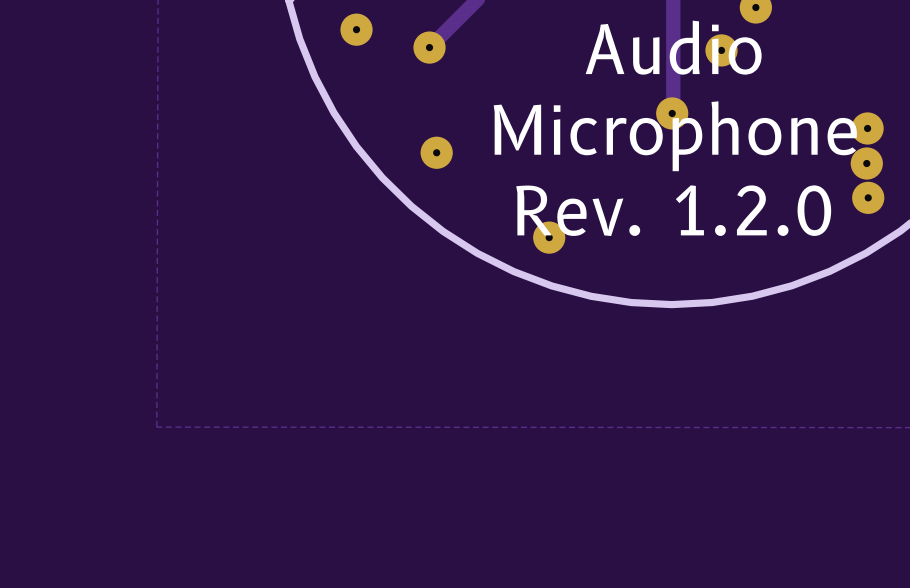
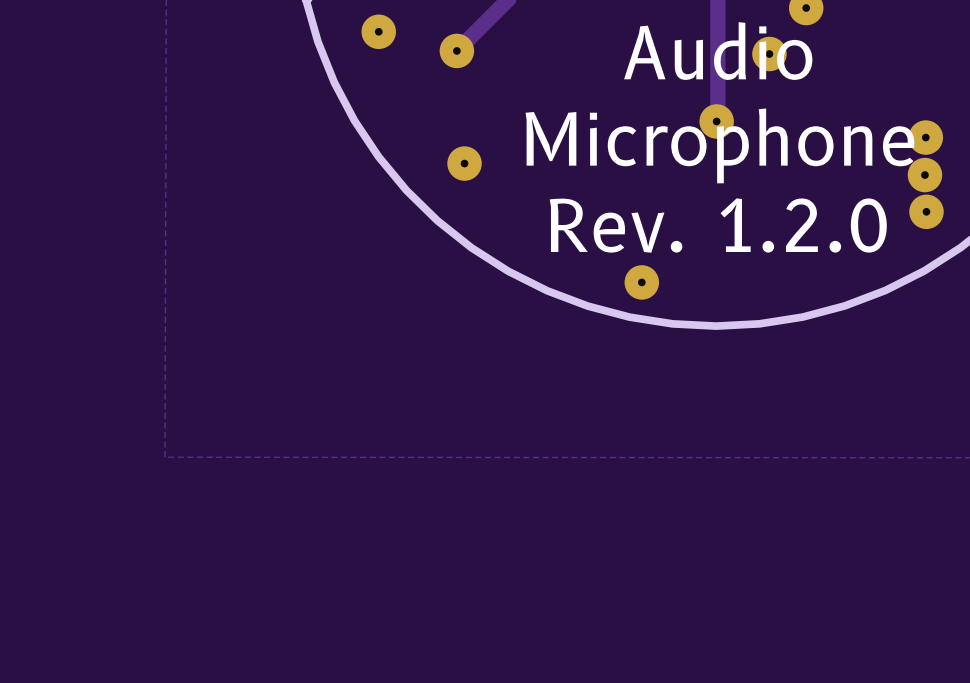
via position: (549, 237) -> (641, 282)

